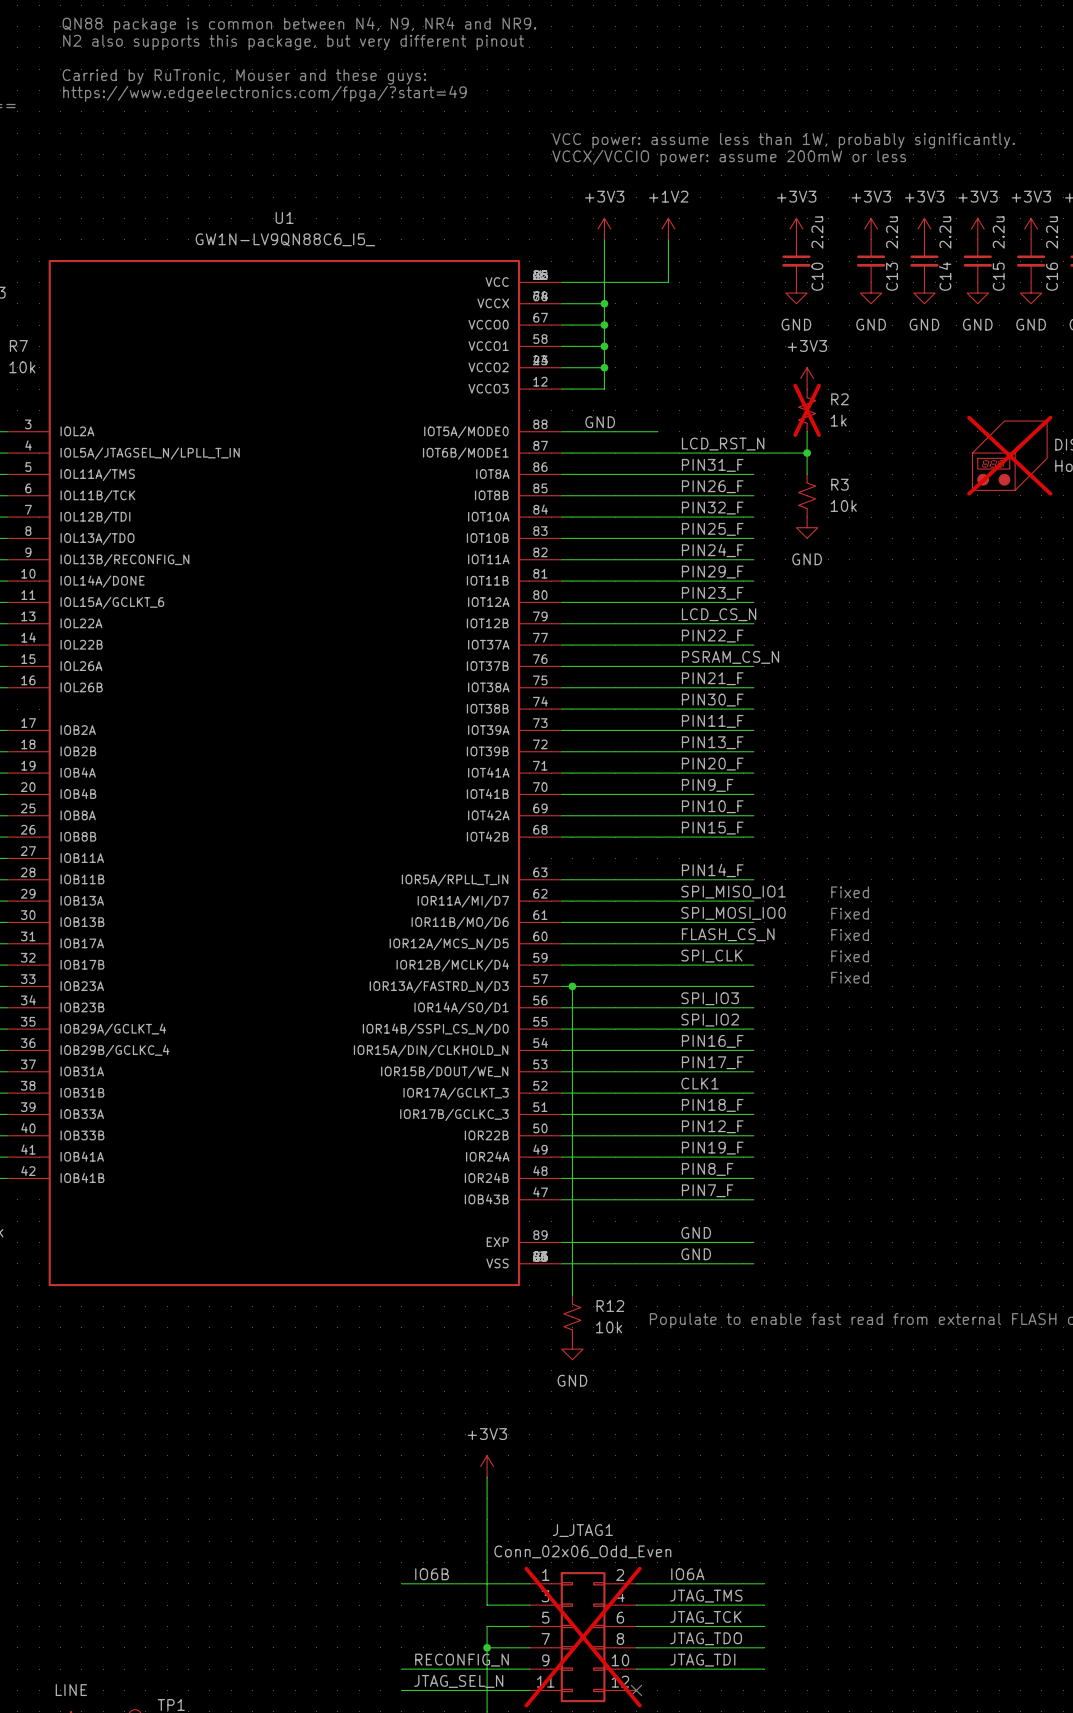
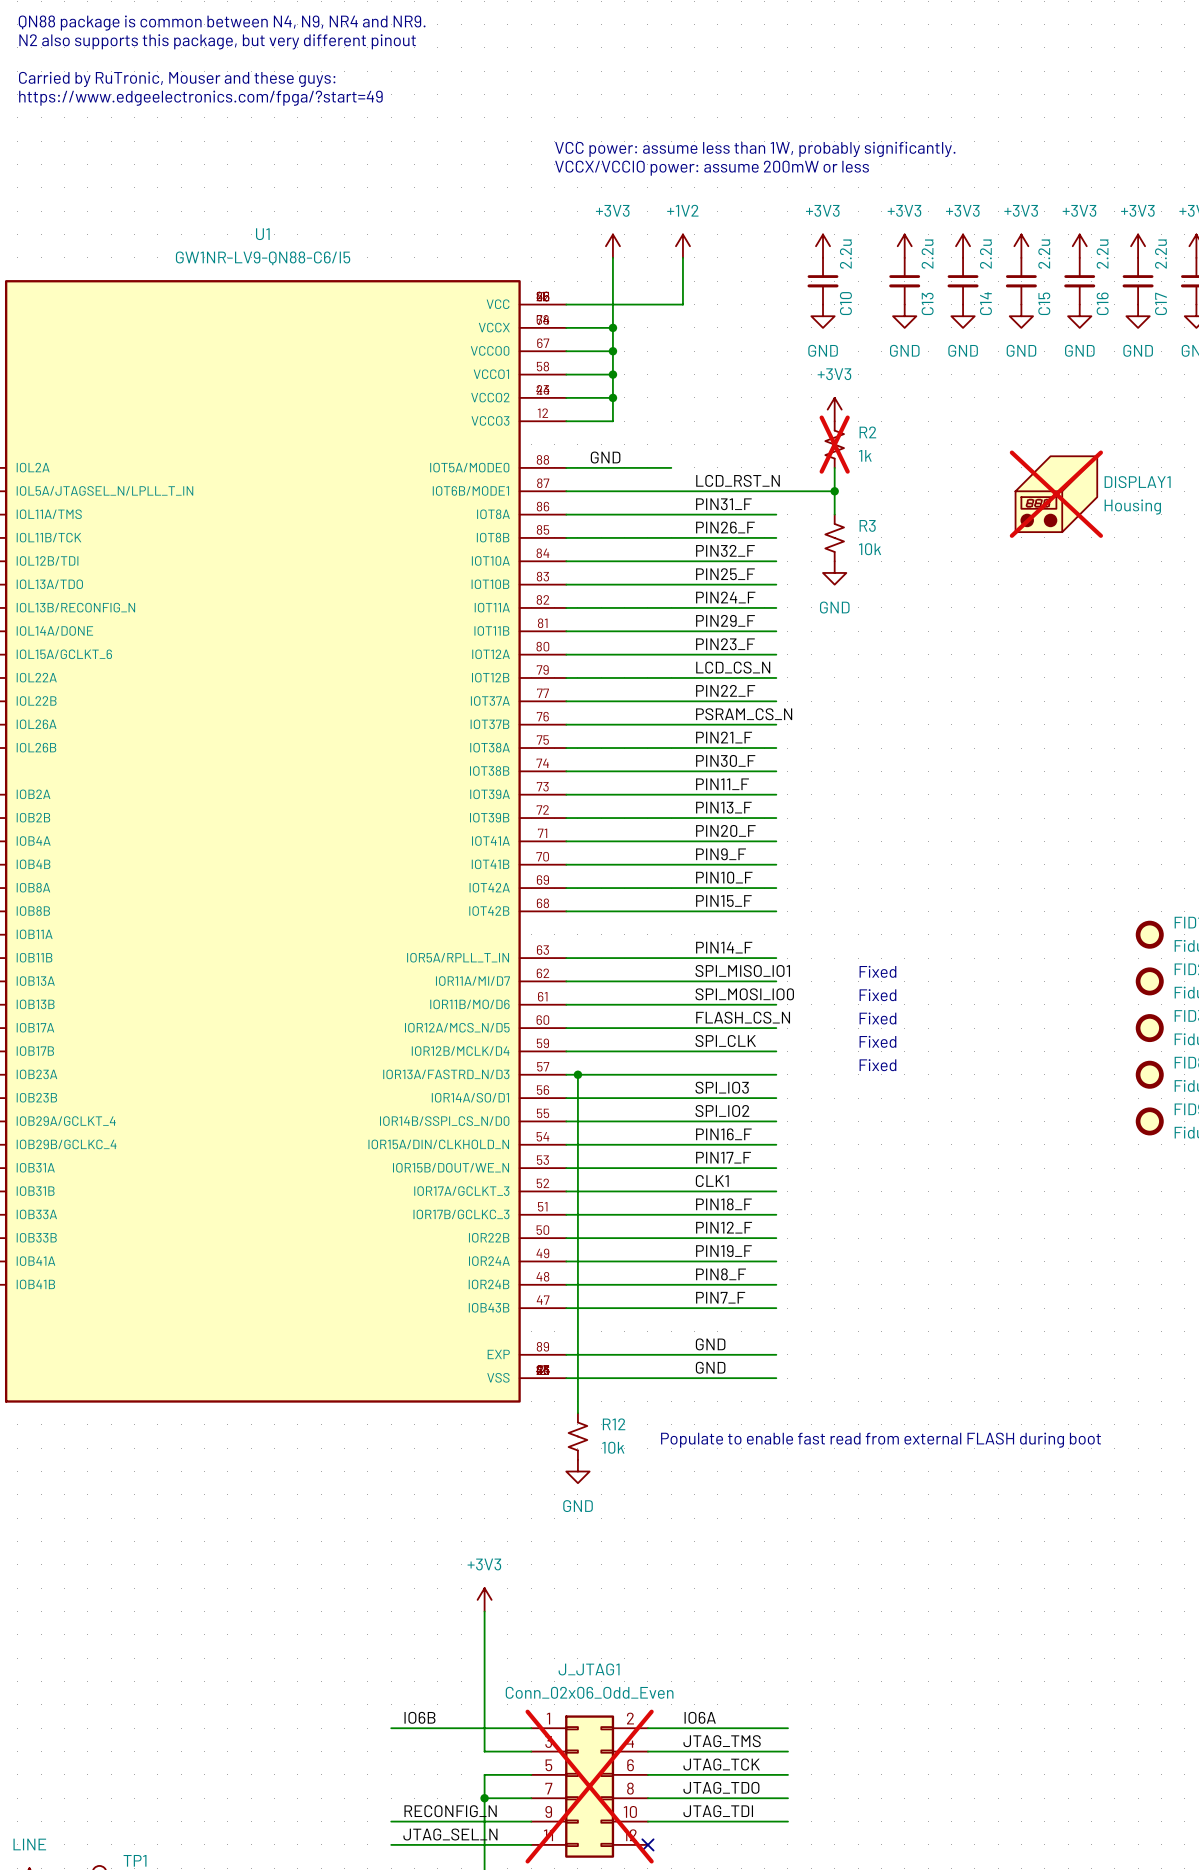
U1 value: GW1N-LV9QN88C6_I5_ (285, 239) -> GW1NR-LV9-QN88-C6/I5 (263, 258)

